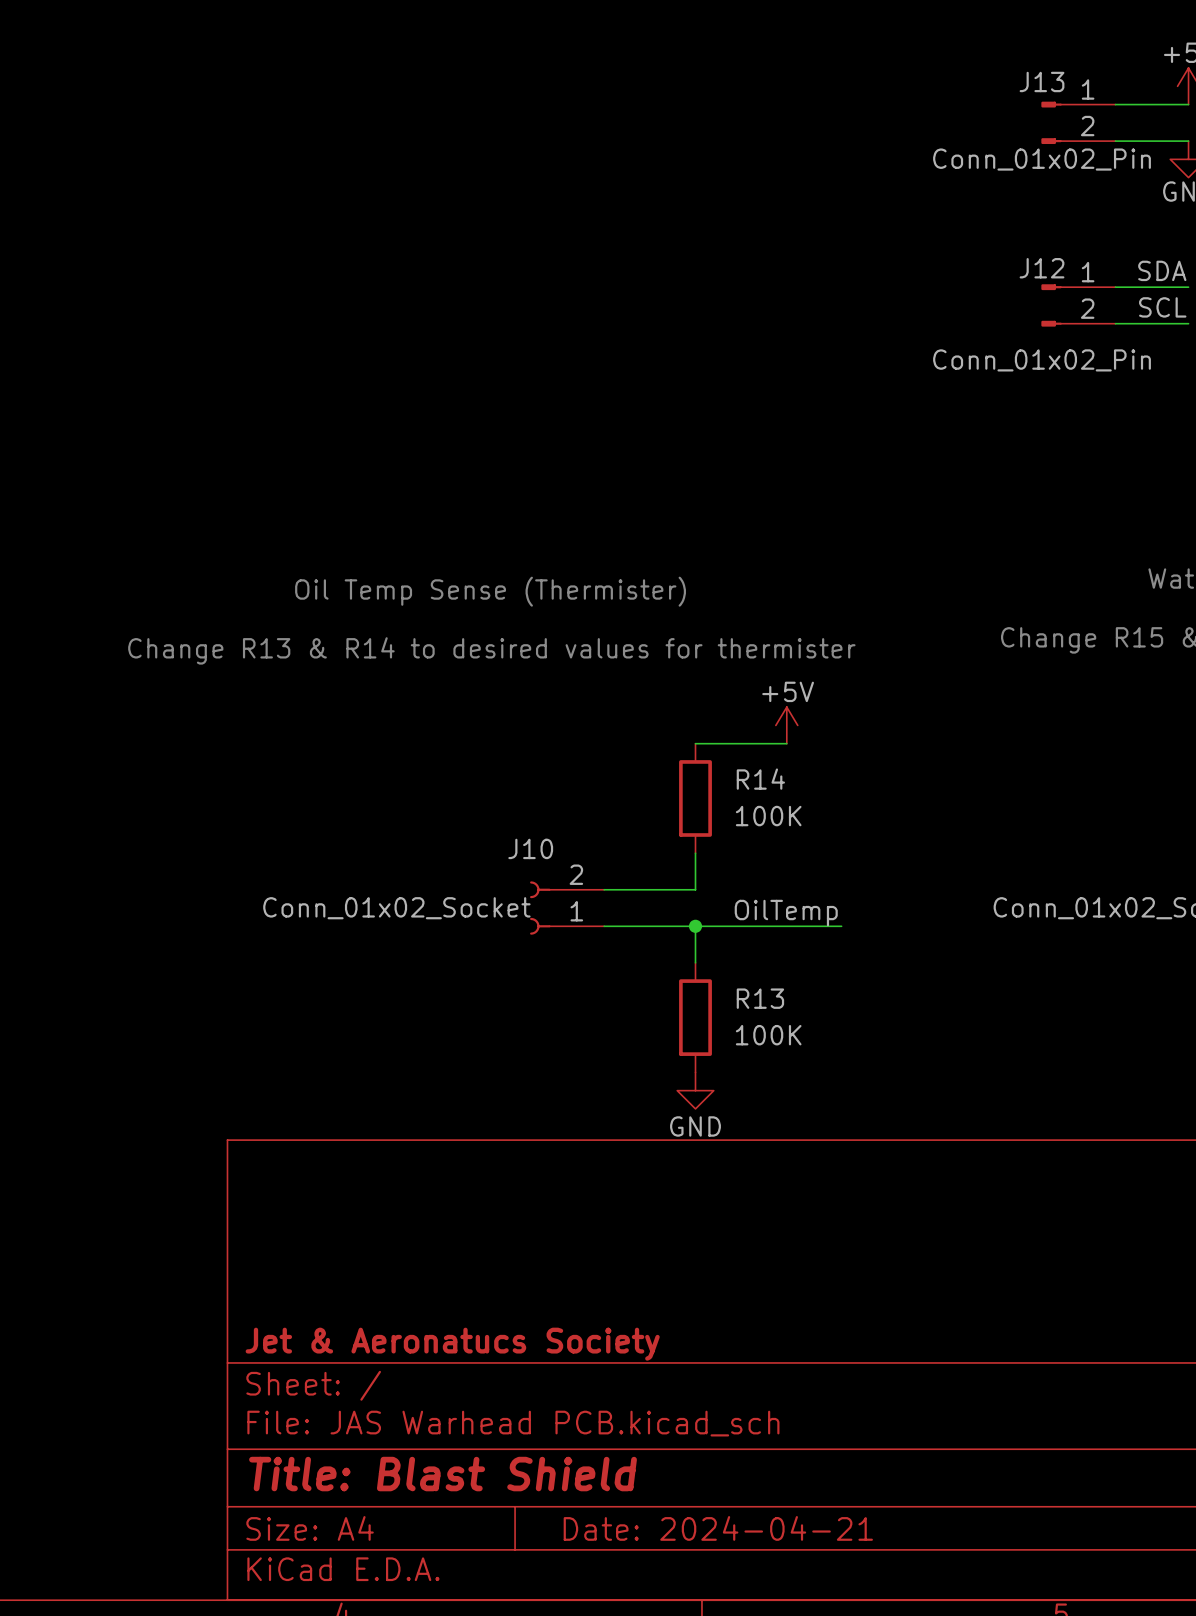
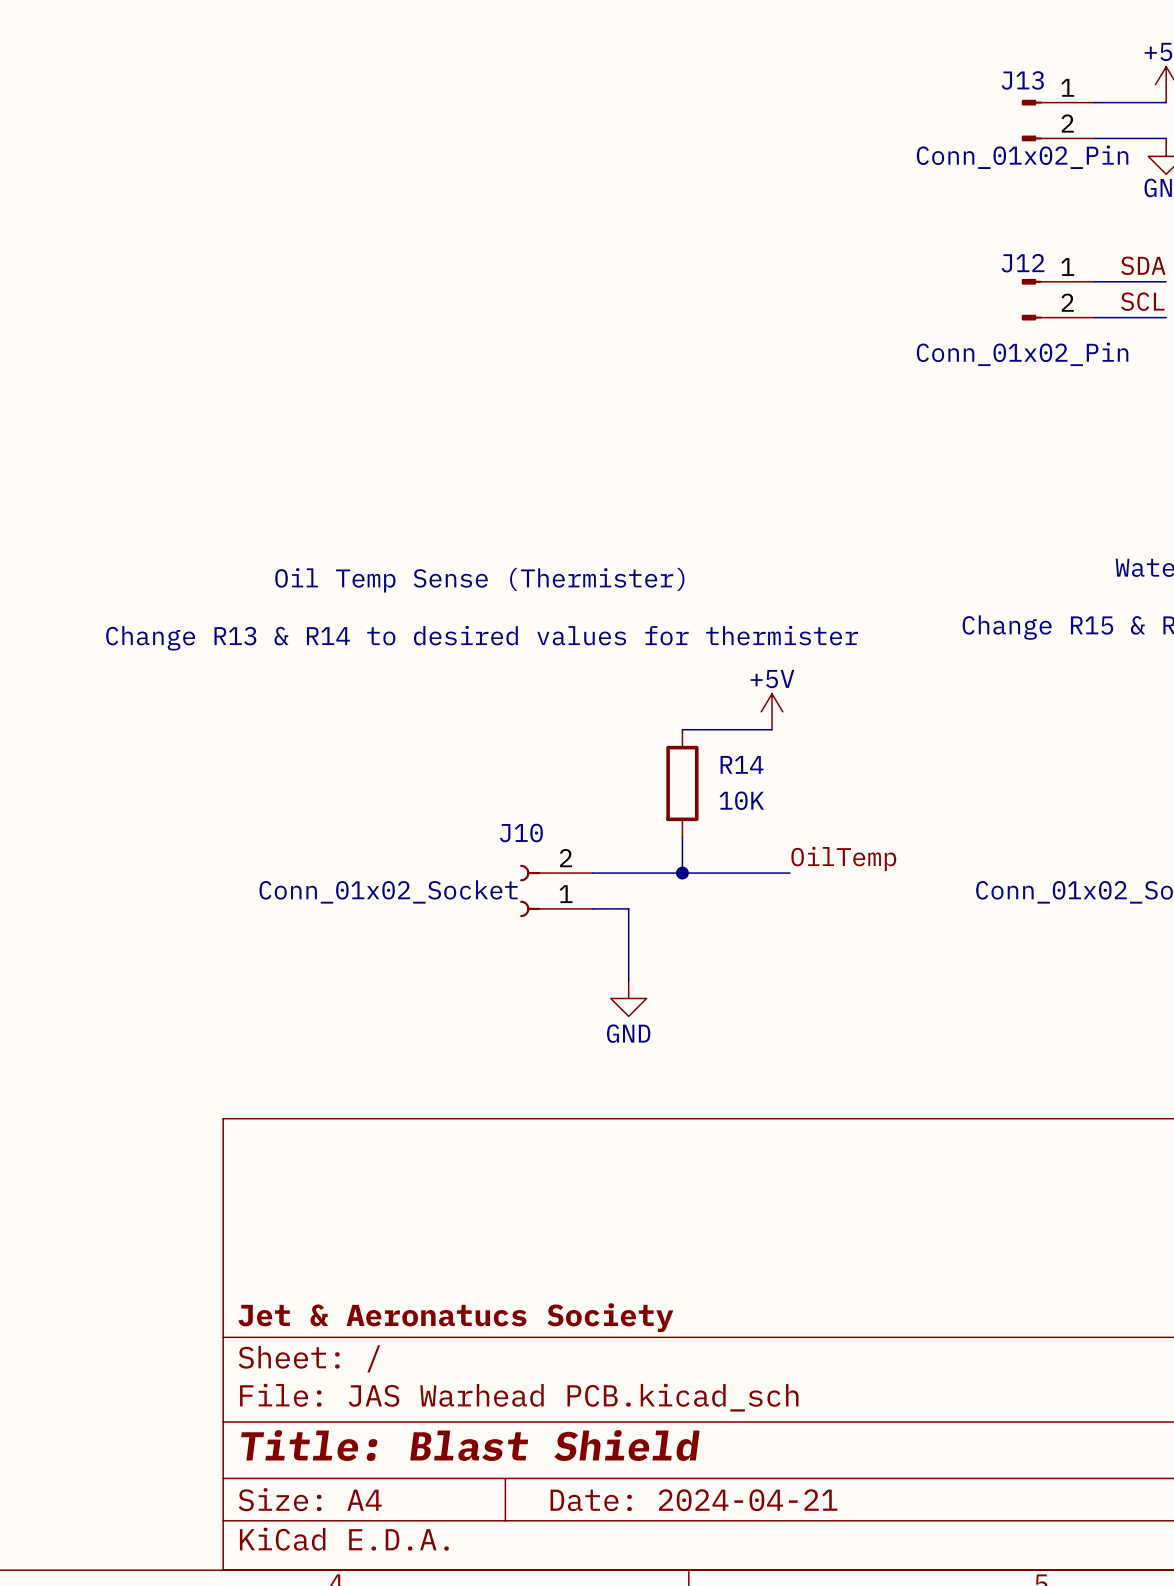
R14 value: 100K (768, 816) -> 10K (741, 800)
wire: none -> (682, 873) (789, 873)
label position: OilTemp (786, 913) -> OilTemp (843, 859)
wire: (640, 926) (841, 926) -> (628, 908) (628, 980)
wire: (695, 926) (695, 962) -> none
junction position: (695, 926) -> (682, 873)
R13: 100K (695, 1017) -> none
power symbol position: GND (695, 1090) -> GND (628, 998)

